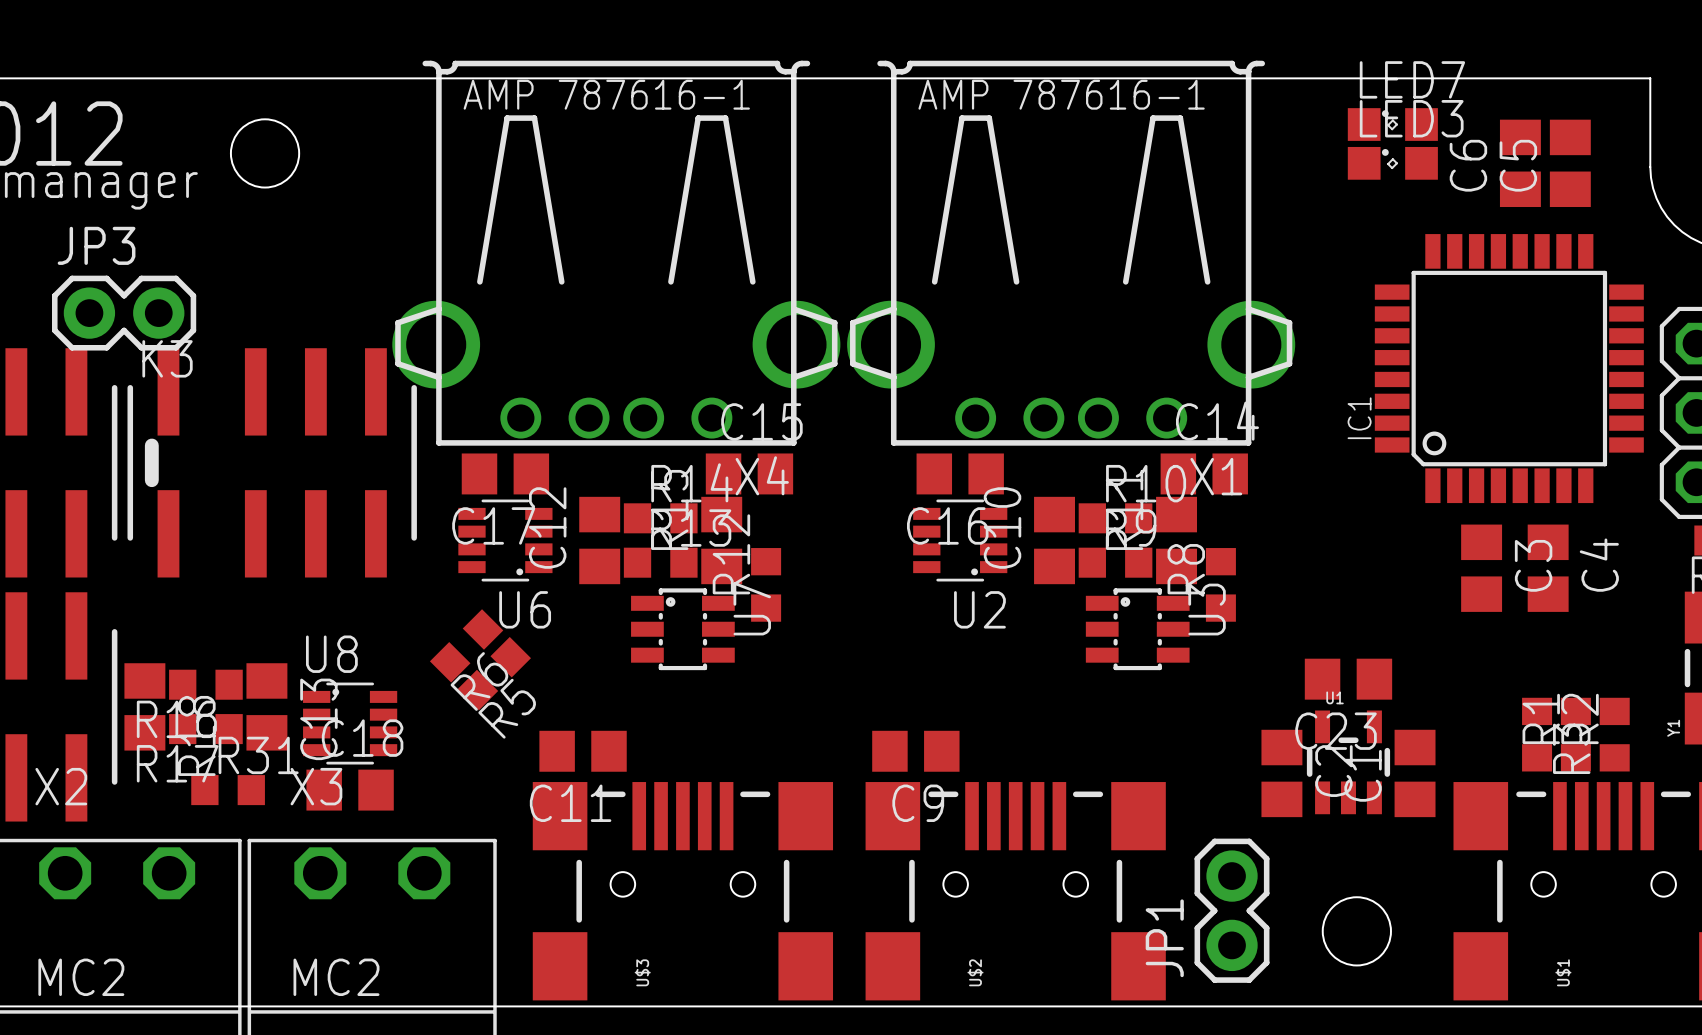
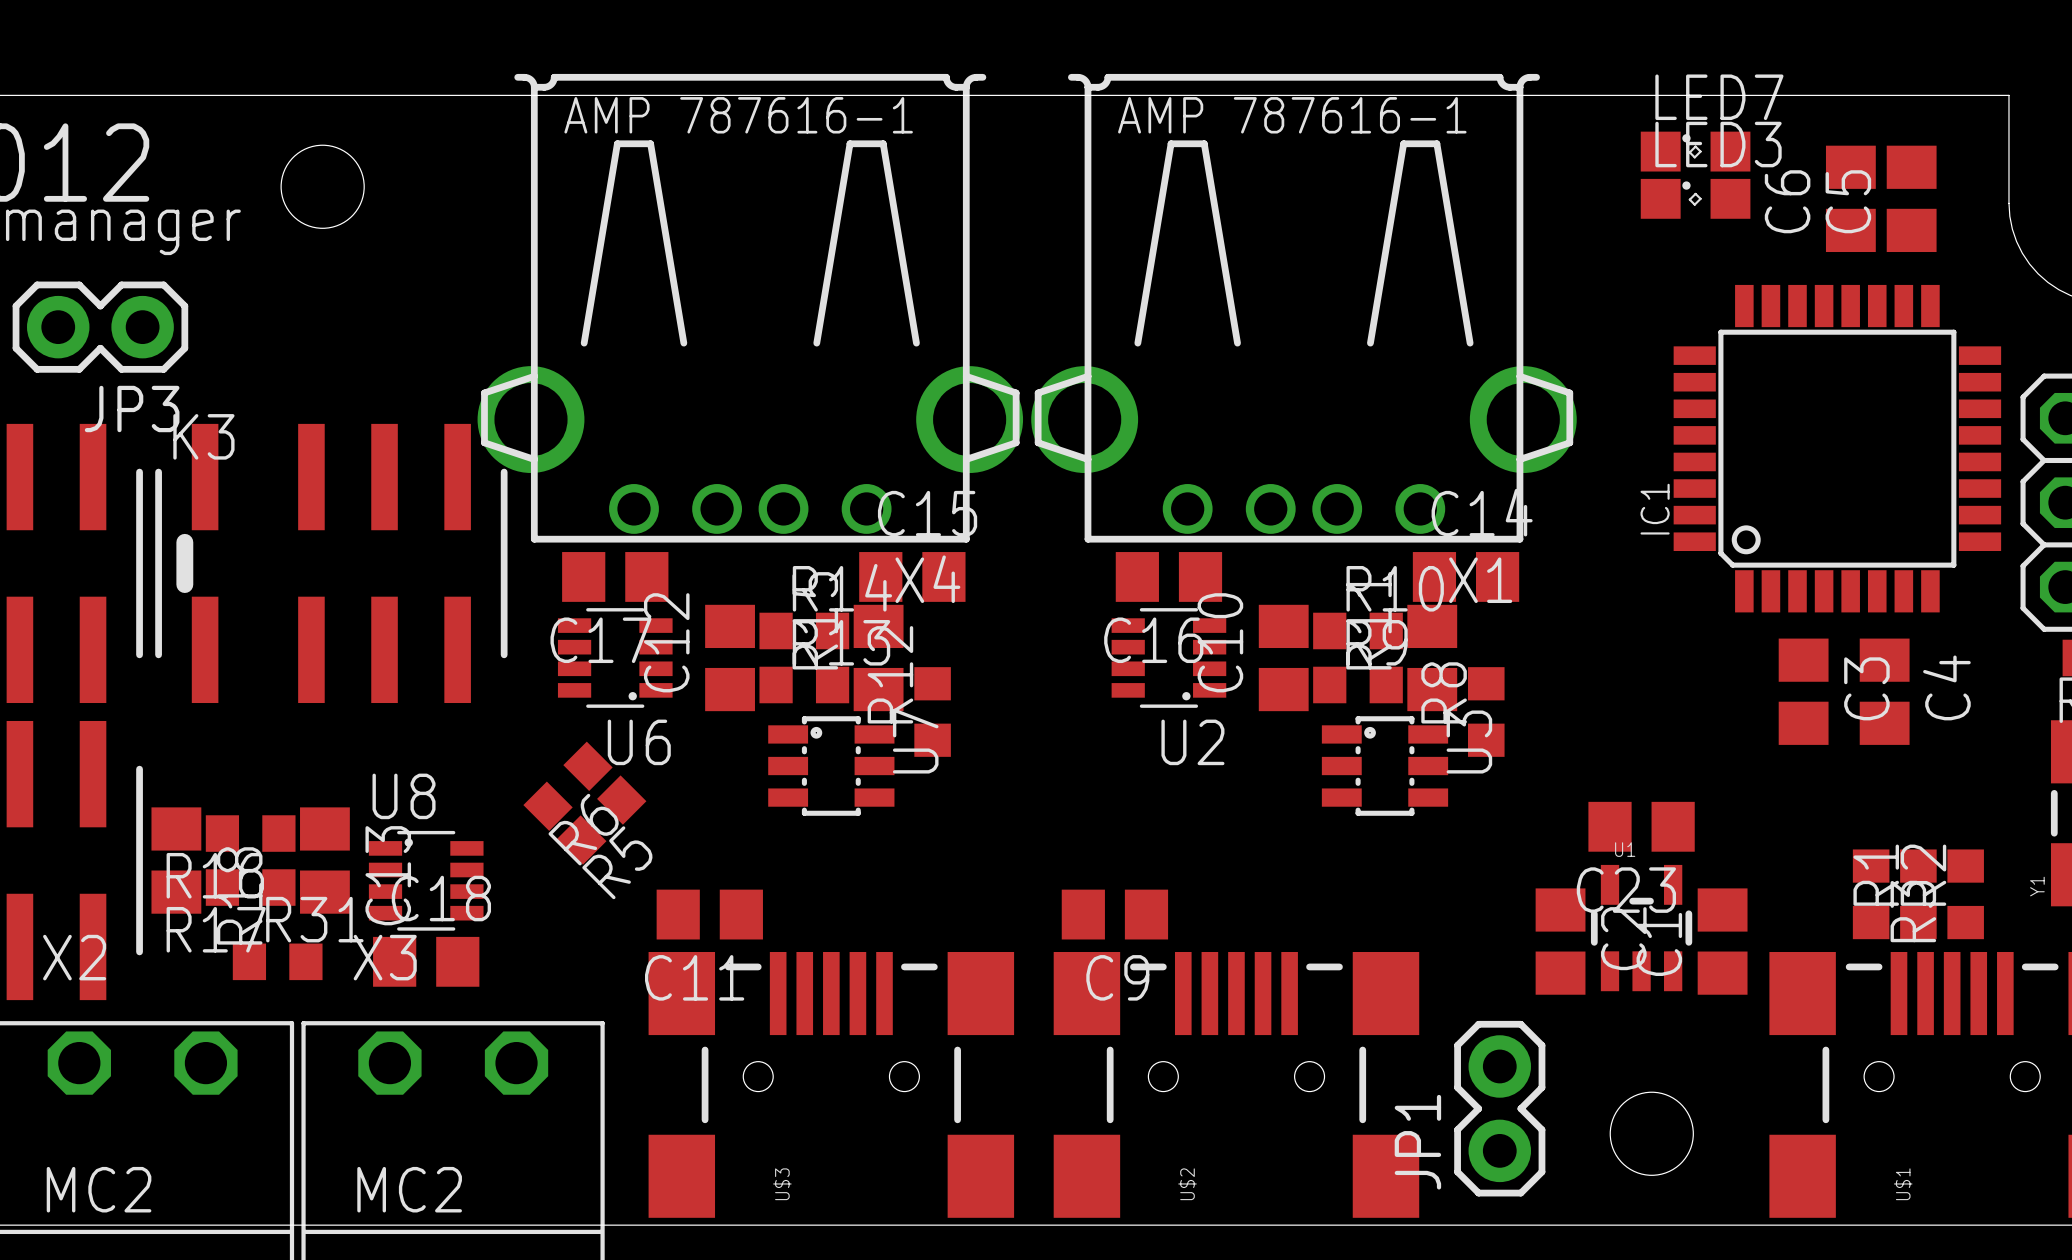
JP3 name position: JP3 (96, 245) -> JP3 (132, 409)
JP3 position: (124, 313) -> (100, 327)

